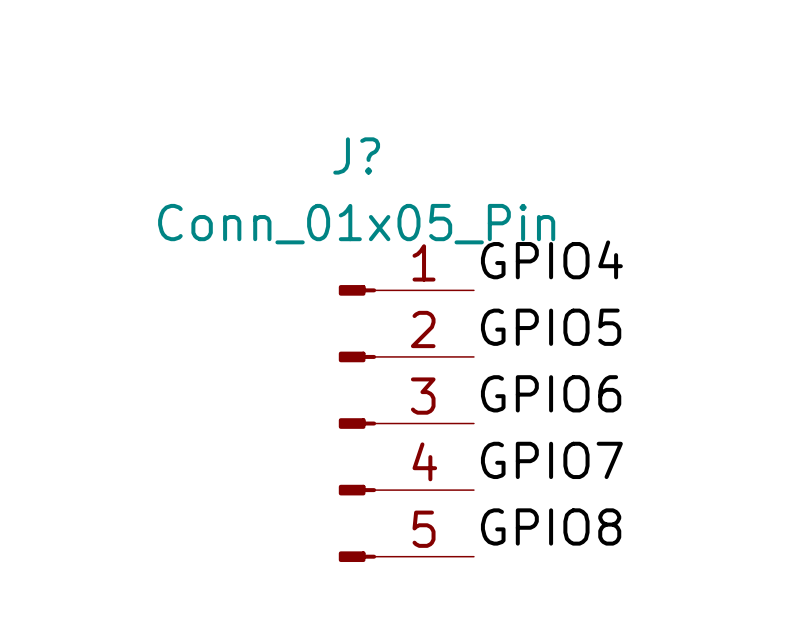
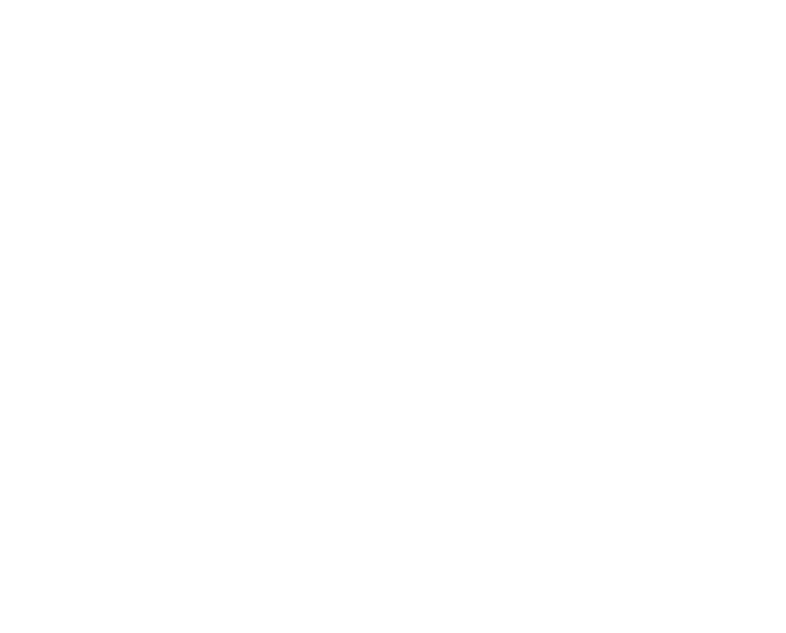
label: GPIO4 (551, 259) -> none
label: GPIO5 (551, 327) -> none
label: GPIO6 (551, 393) -> none
J?: Conn_01x05_Pin (406, 423) -> none
label: GPIO7 (551, 460) -> none
label: GPIO8 (551, 526) -> none

